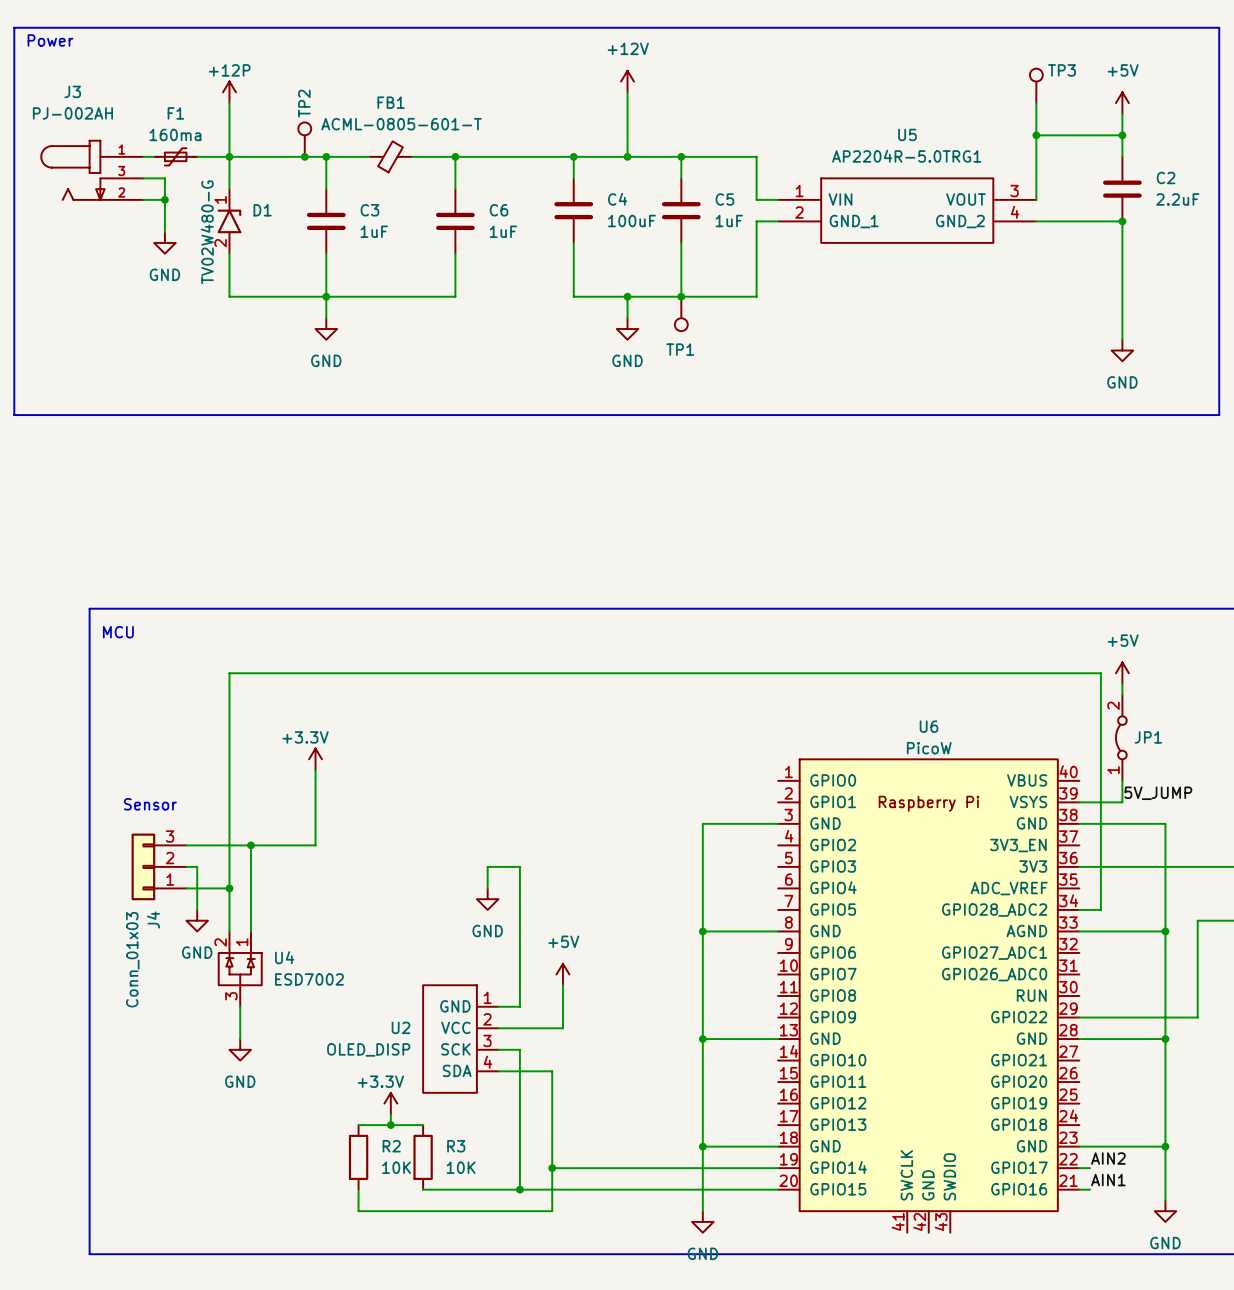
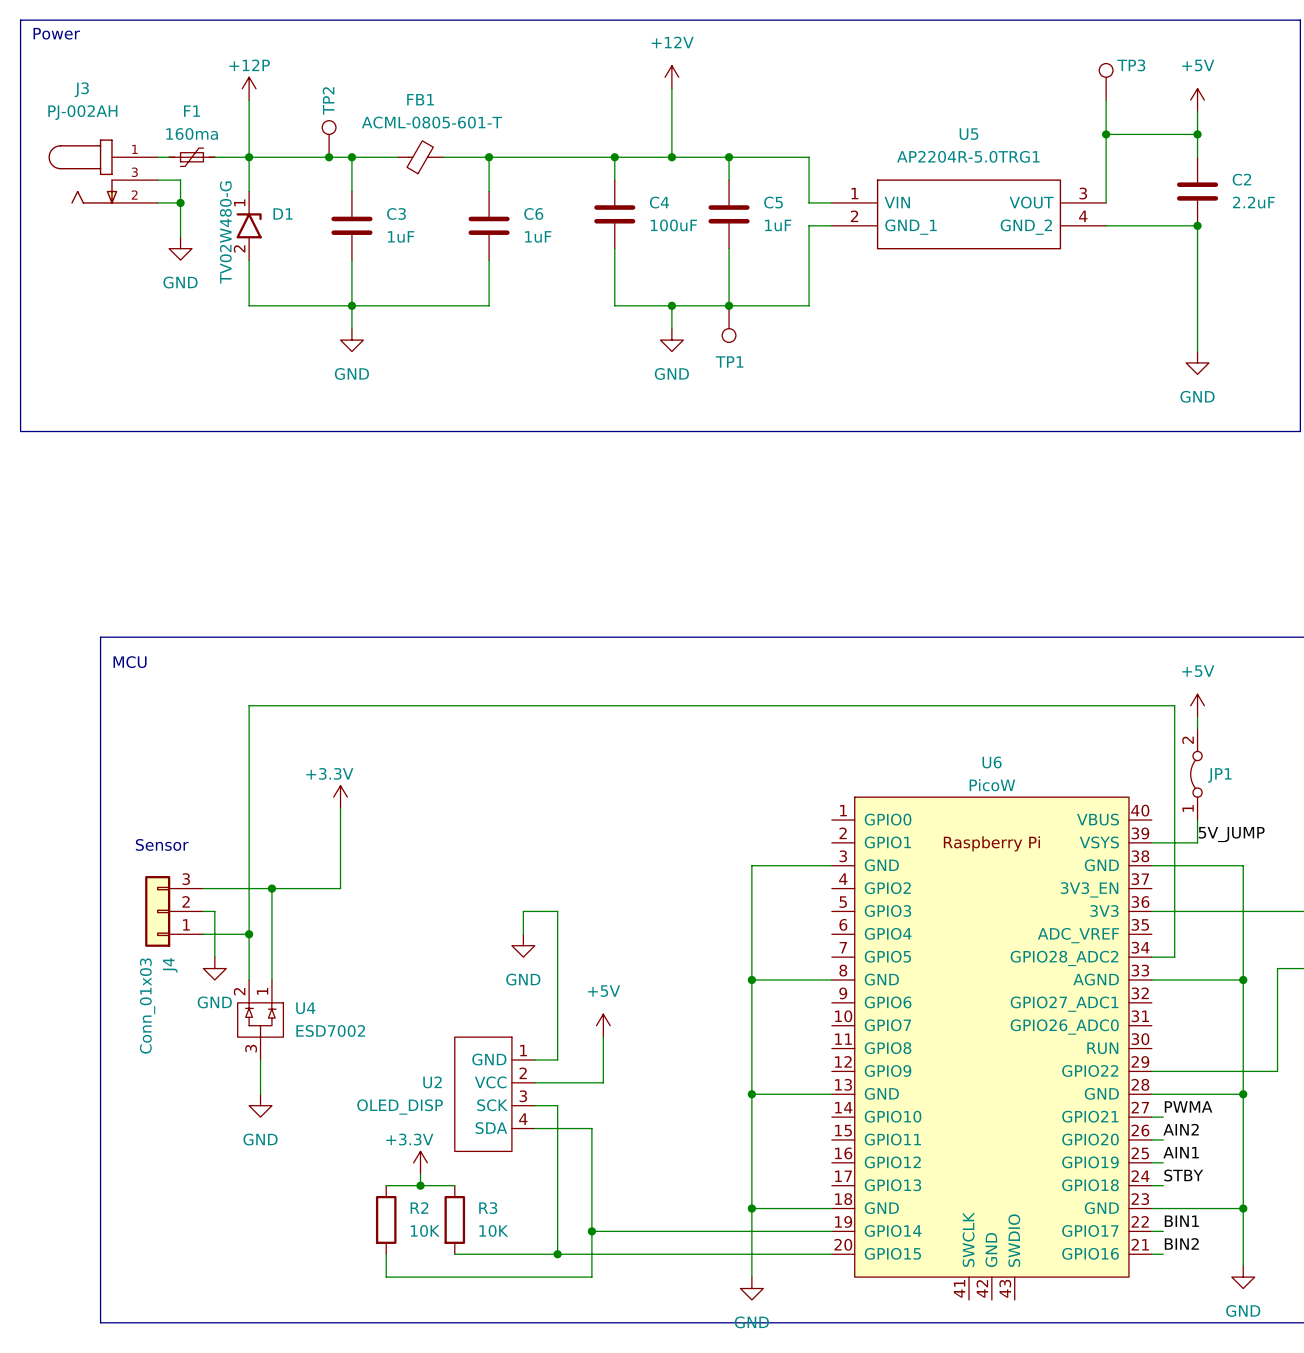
label: none -> PWMA (1188, 1106)
wire: none -> (1151, 1117) (1163, 1117)
label: none -> AIN2 (1181, 1129)
wire: none -> (1151, 1139) (1163, 1139)
label: none -> AIN1 (1181, 1152)
wire: none -> (1151, 1162) (1163, 1162)
label: none -> STBY (1183, 1175)
wire: none -> (1151, 1185) (1163, 1185)
label: AIN2 (1108, 1158) -> BIN1 (1181, 1221)
label: AIN1 (1108, 1180) -> BIN2 (1181, 1243)

